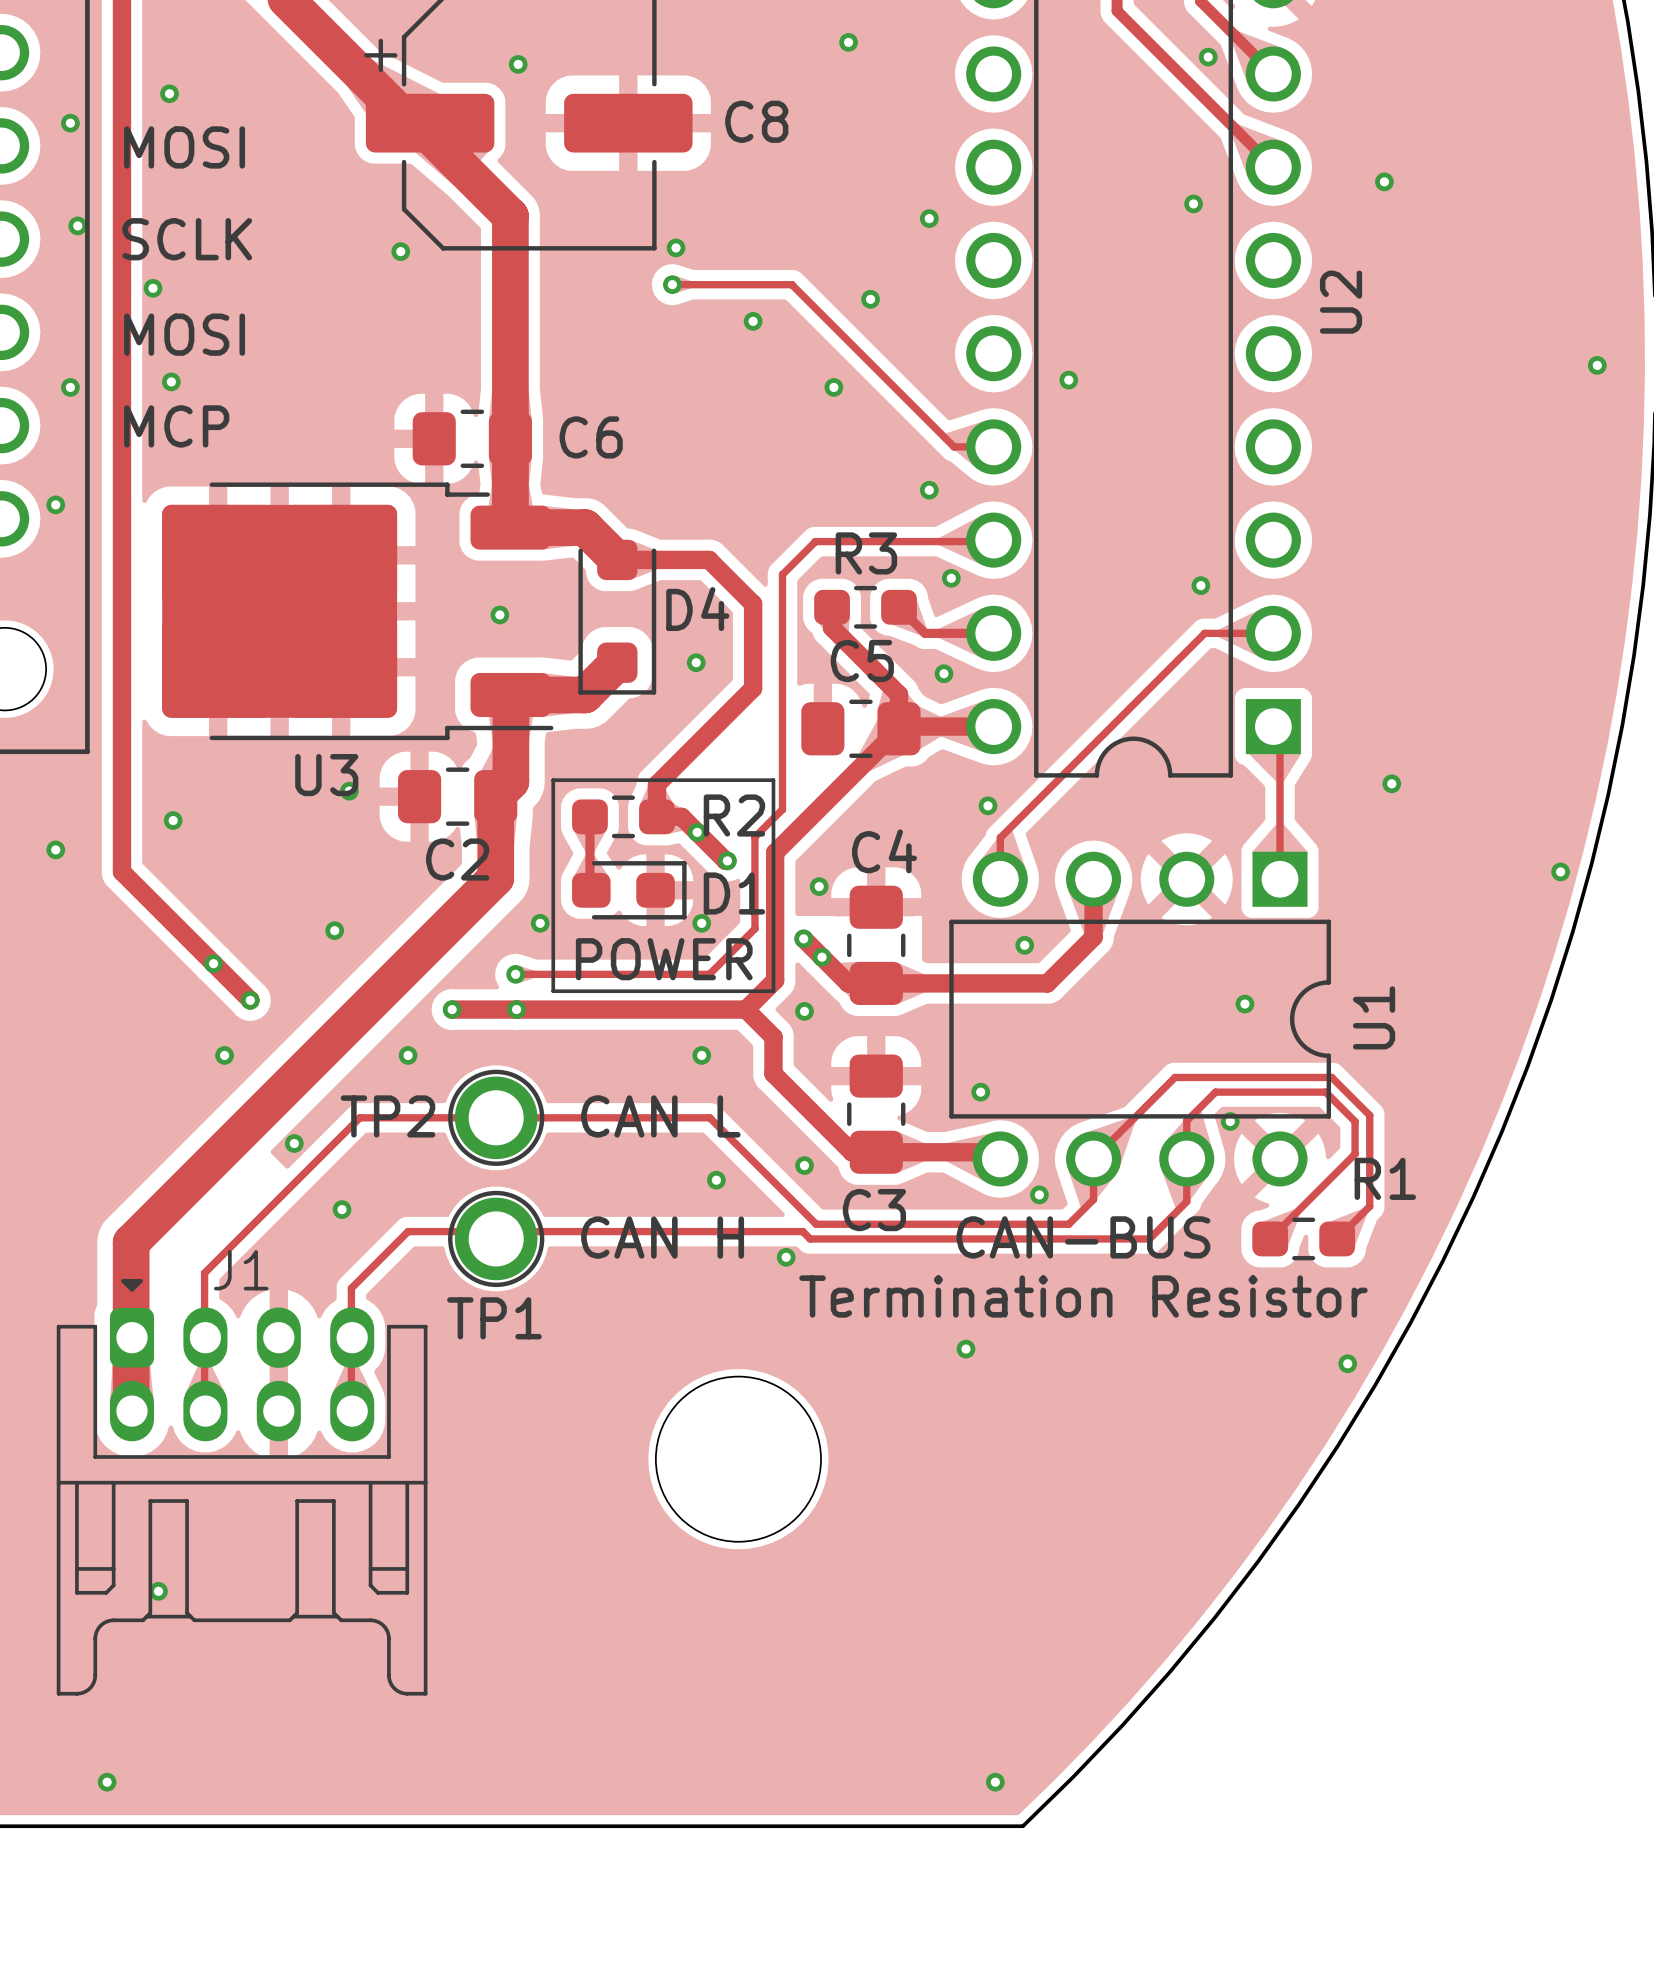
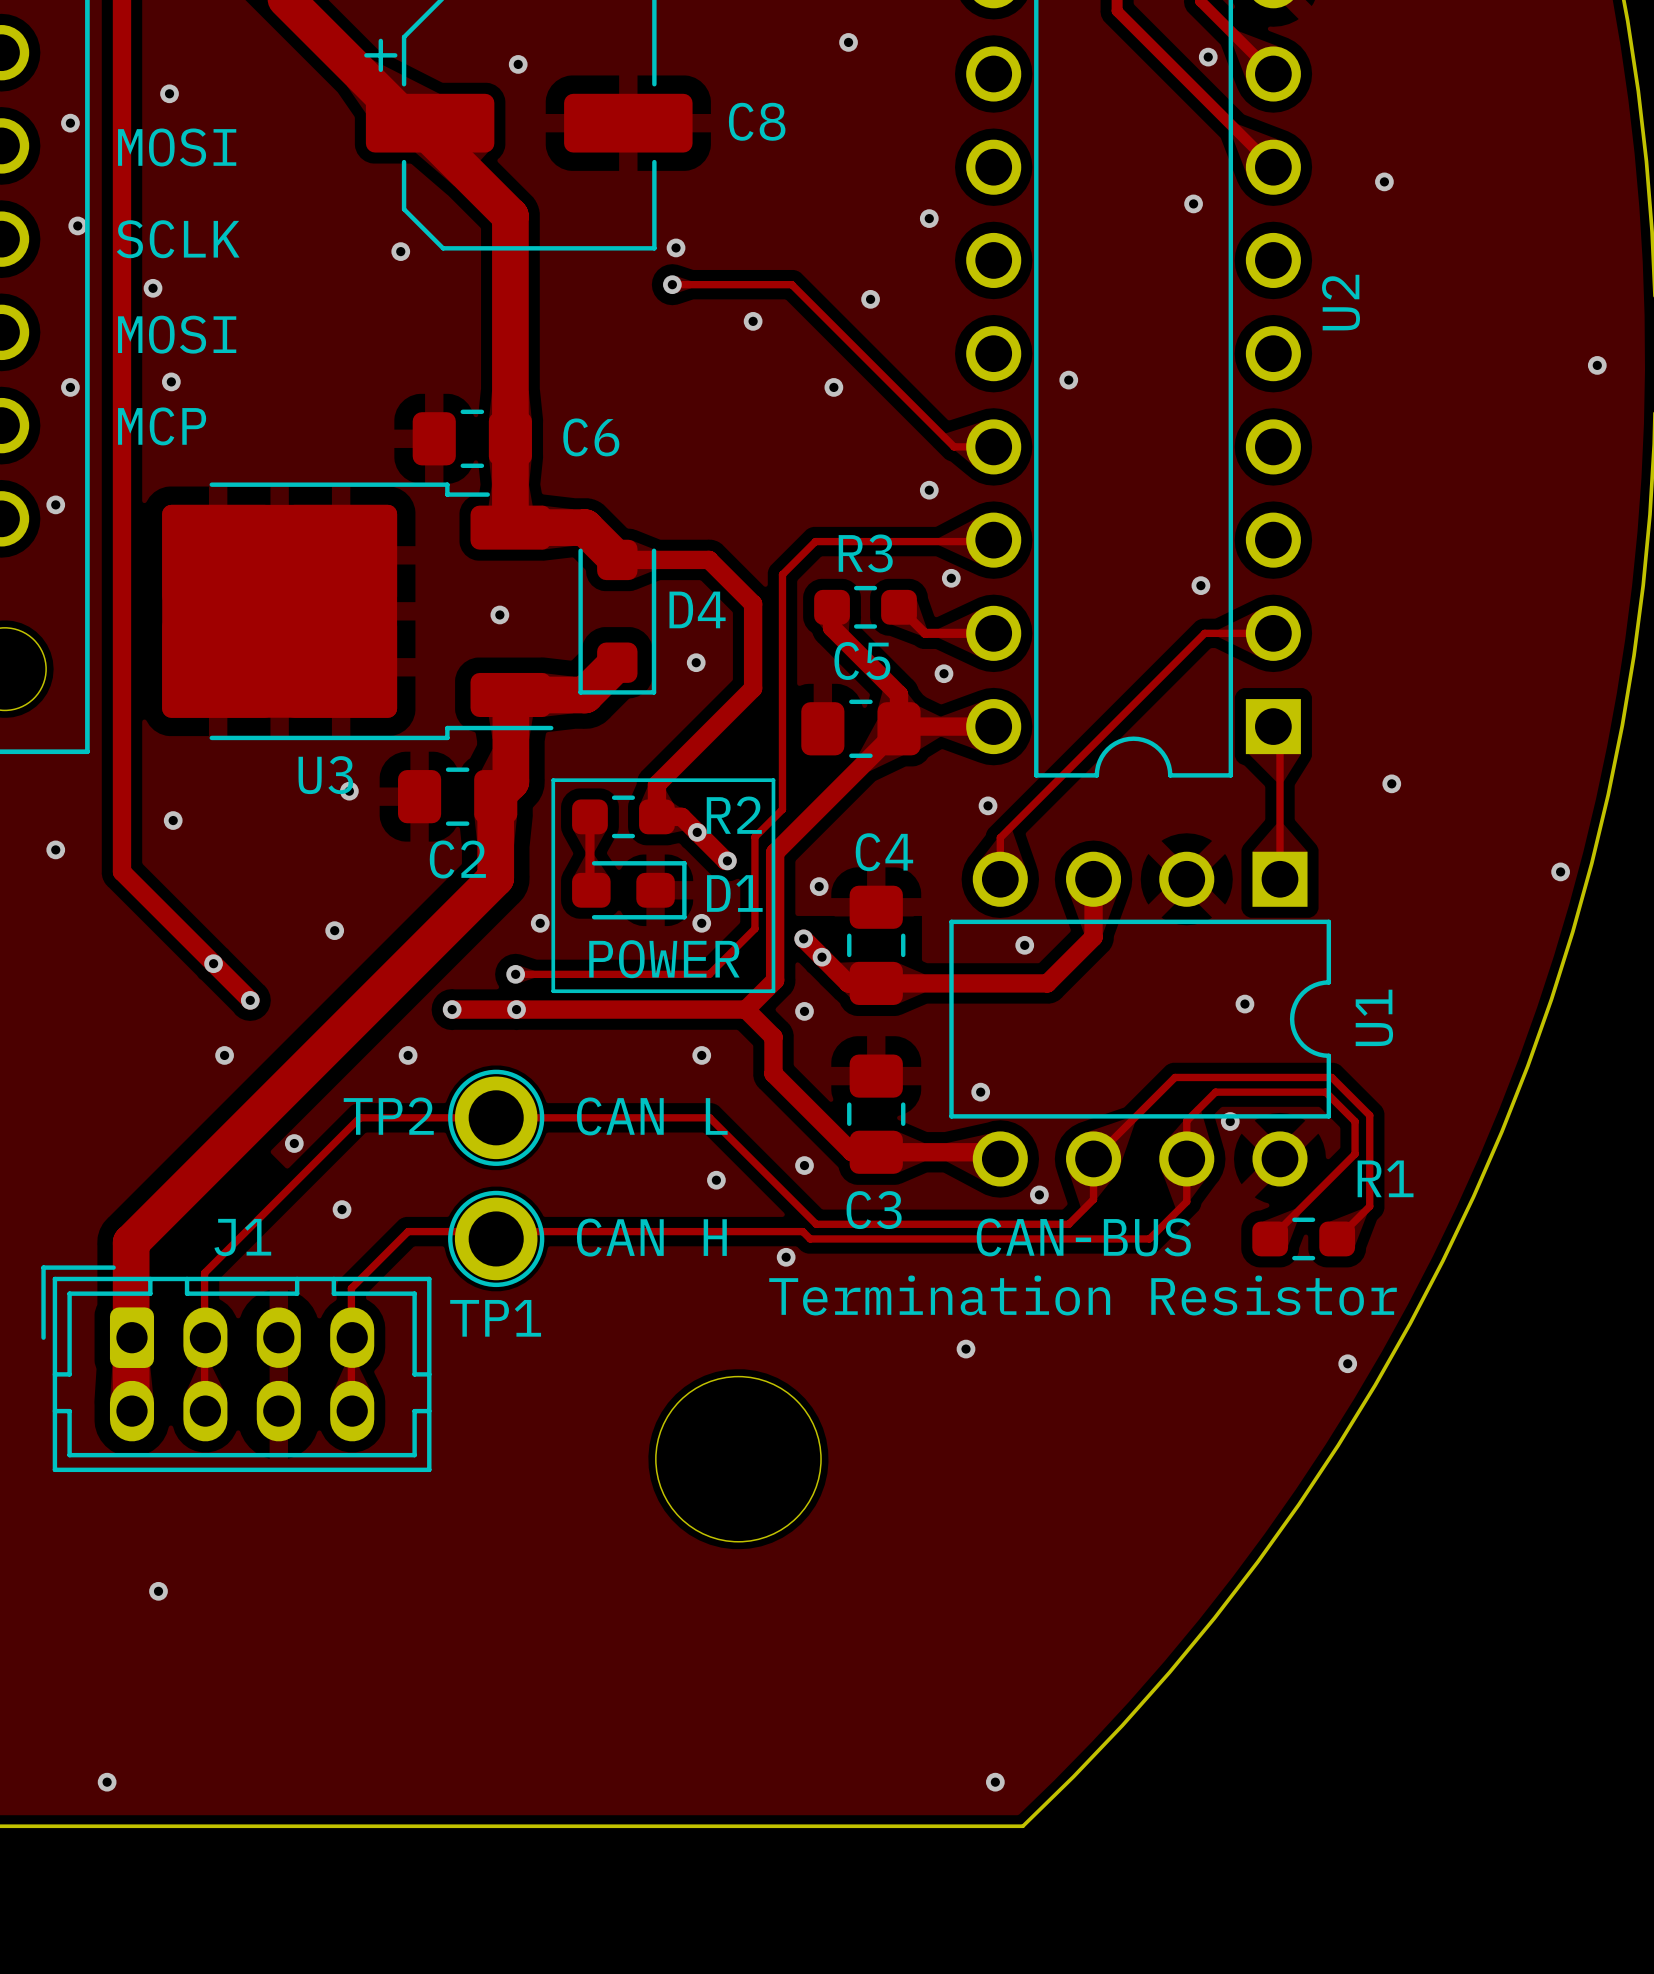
J1 name position: J1 (241, 1270) -> J1 (242, 1237)
J1 footprint: [56, 1278, 428, 1696] -> [41, 1265, 432, 1473]

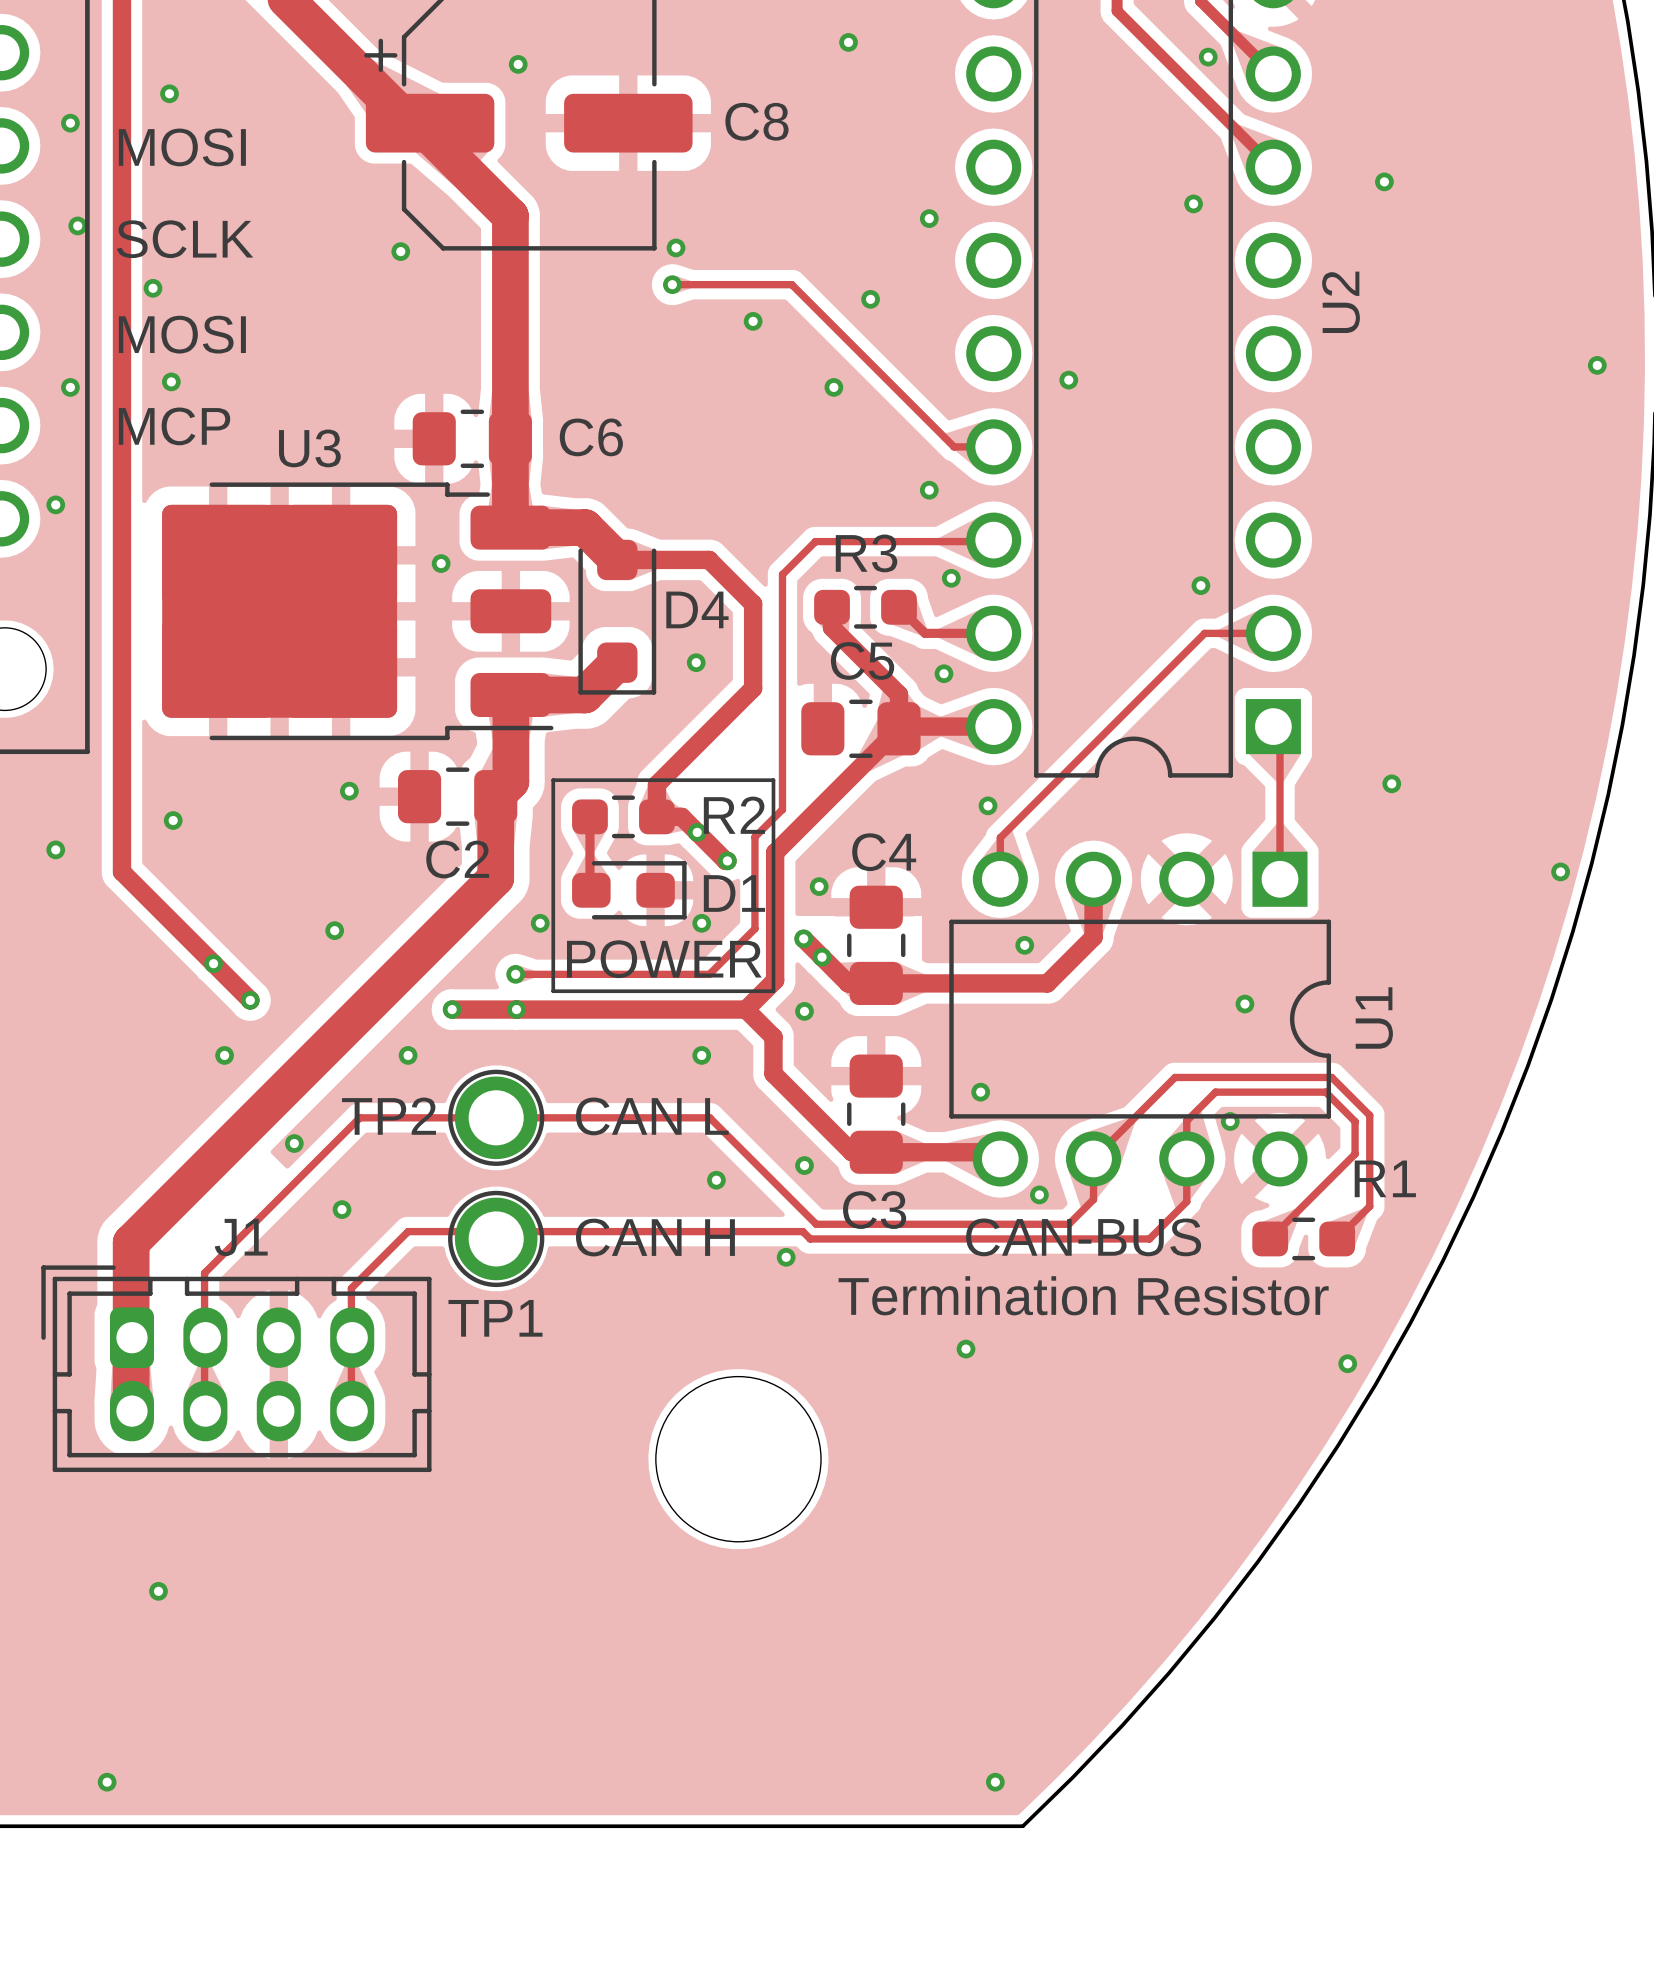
U3 footprint: [162, 482, 554, 741] -> [162, 482, 554, 741]
via position: (499, 614) -> (441, 563)
U3 name position: U3 (325, 775) -> U3 (309, 448)

